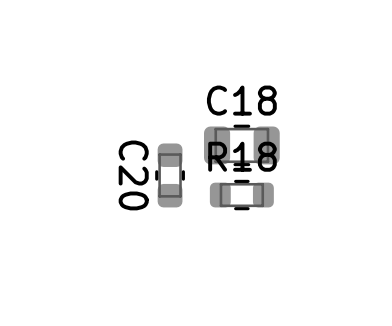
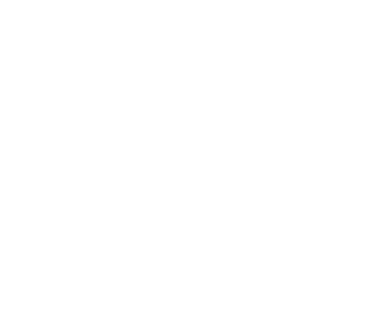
C18: (241, 145) -> none
C20: (170, 175) -> none
R18: (241, 195) -> none

